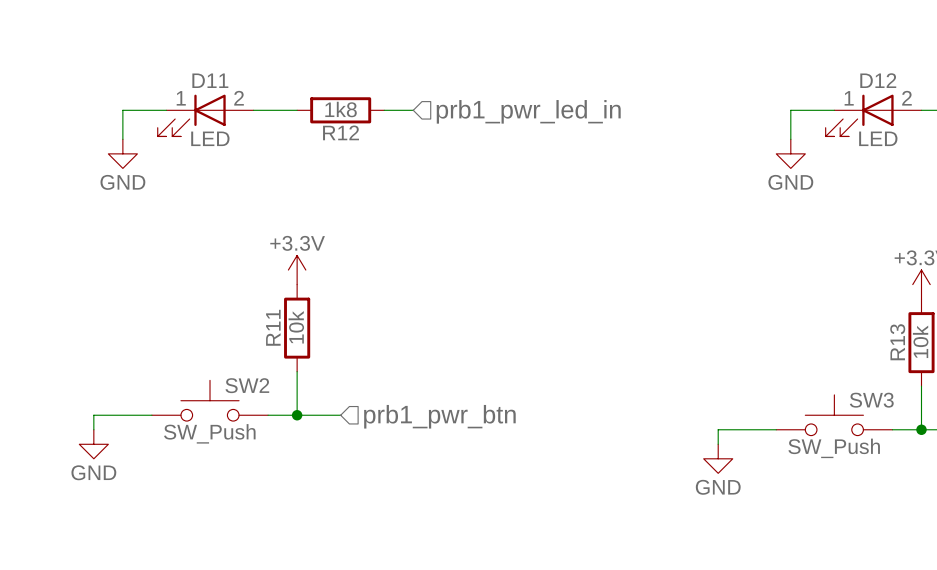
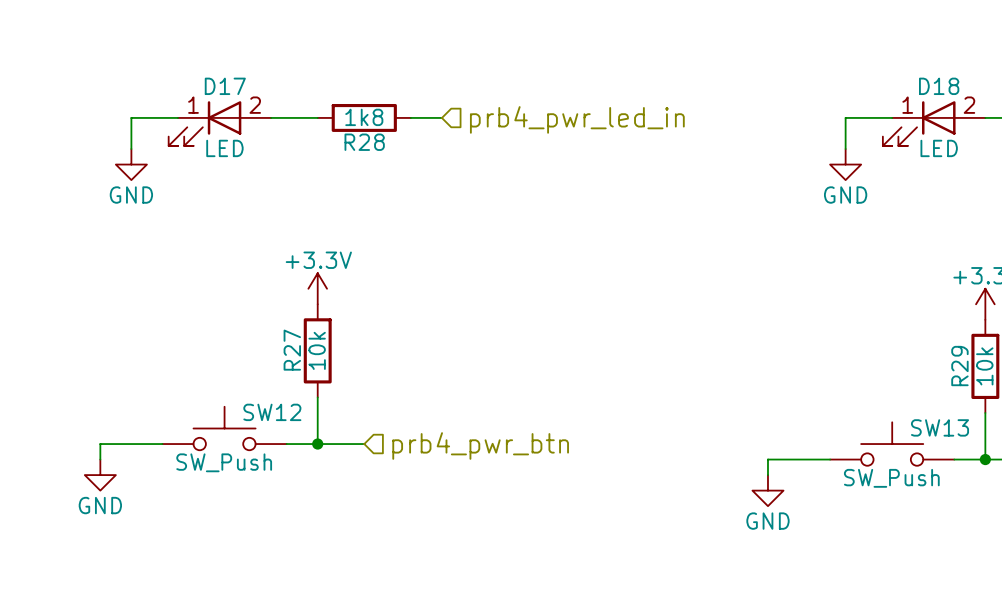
D11 name: D11 (210, 80) -> D17 (225, 86)
D12 name: D12 (878, 80) -> D18 (939, 86)
hierarchical label: prb1_pwr_led_in (528, 111) -> prb4_pwr_led_in (577, 119)
R12 name: R12 (341, 132) -> R28 (364, 142)
R11 name: R11 (273, 327) -> R27 (292, 350)
R13 name: R13 (897, 342) -> R29 (959, 366)
SW2 name: SW2 (247, 385) -> SW12 (272, 412)
SW3 name: SW3 (871, 400) -> SW13 (940, 427)
hierarchical label: prb1_pwr_btn (439, 416) -> prb4_pwr_btn (480, 445)

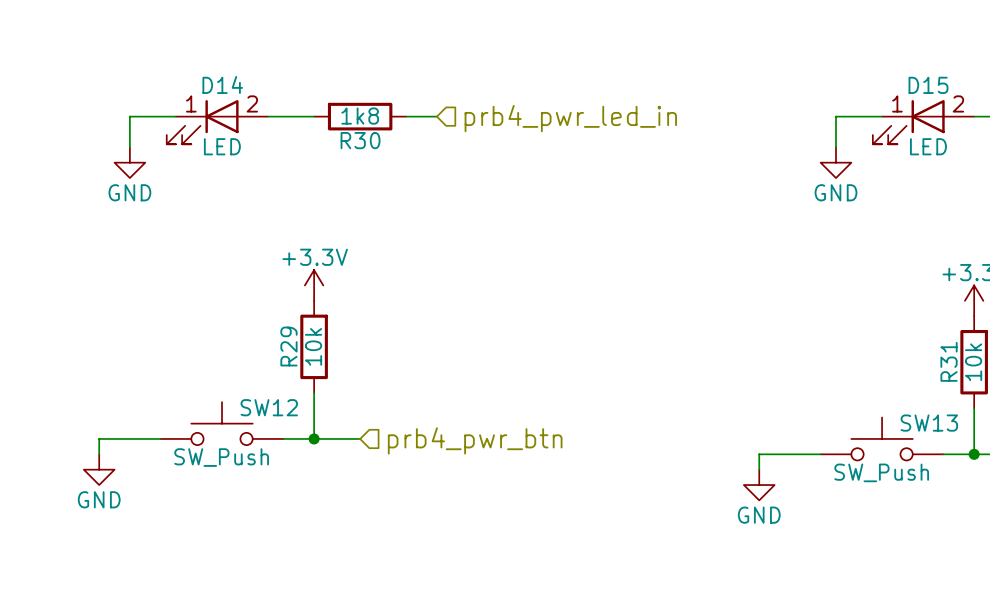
D17 name: D17 (225, 86) -> D14 (222, 84)
D18 name: D18 (939, 86) -> D15 (928, 85)
R28 name: R28 (364, 142) -> R30 (360, 140)
R27 name: R27 (292, 350) -> R29 (288, 346)
R29 name: R29 (959, 366) -> R31 (949, 361)

